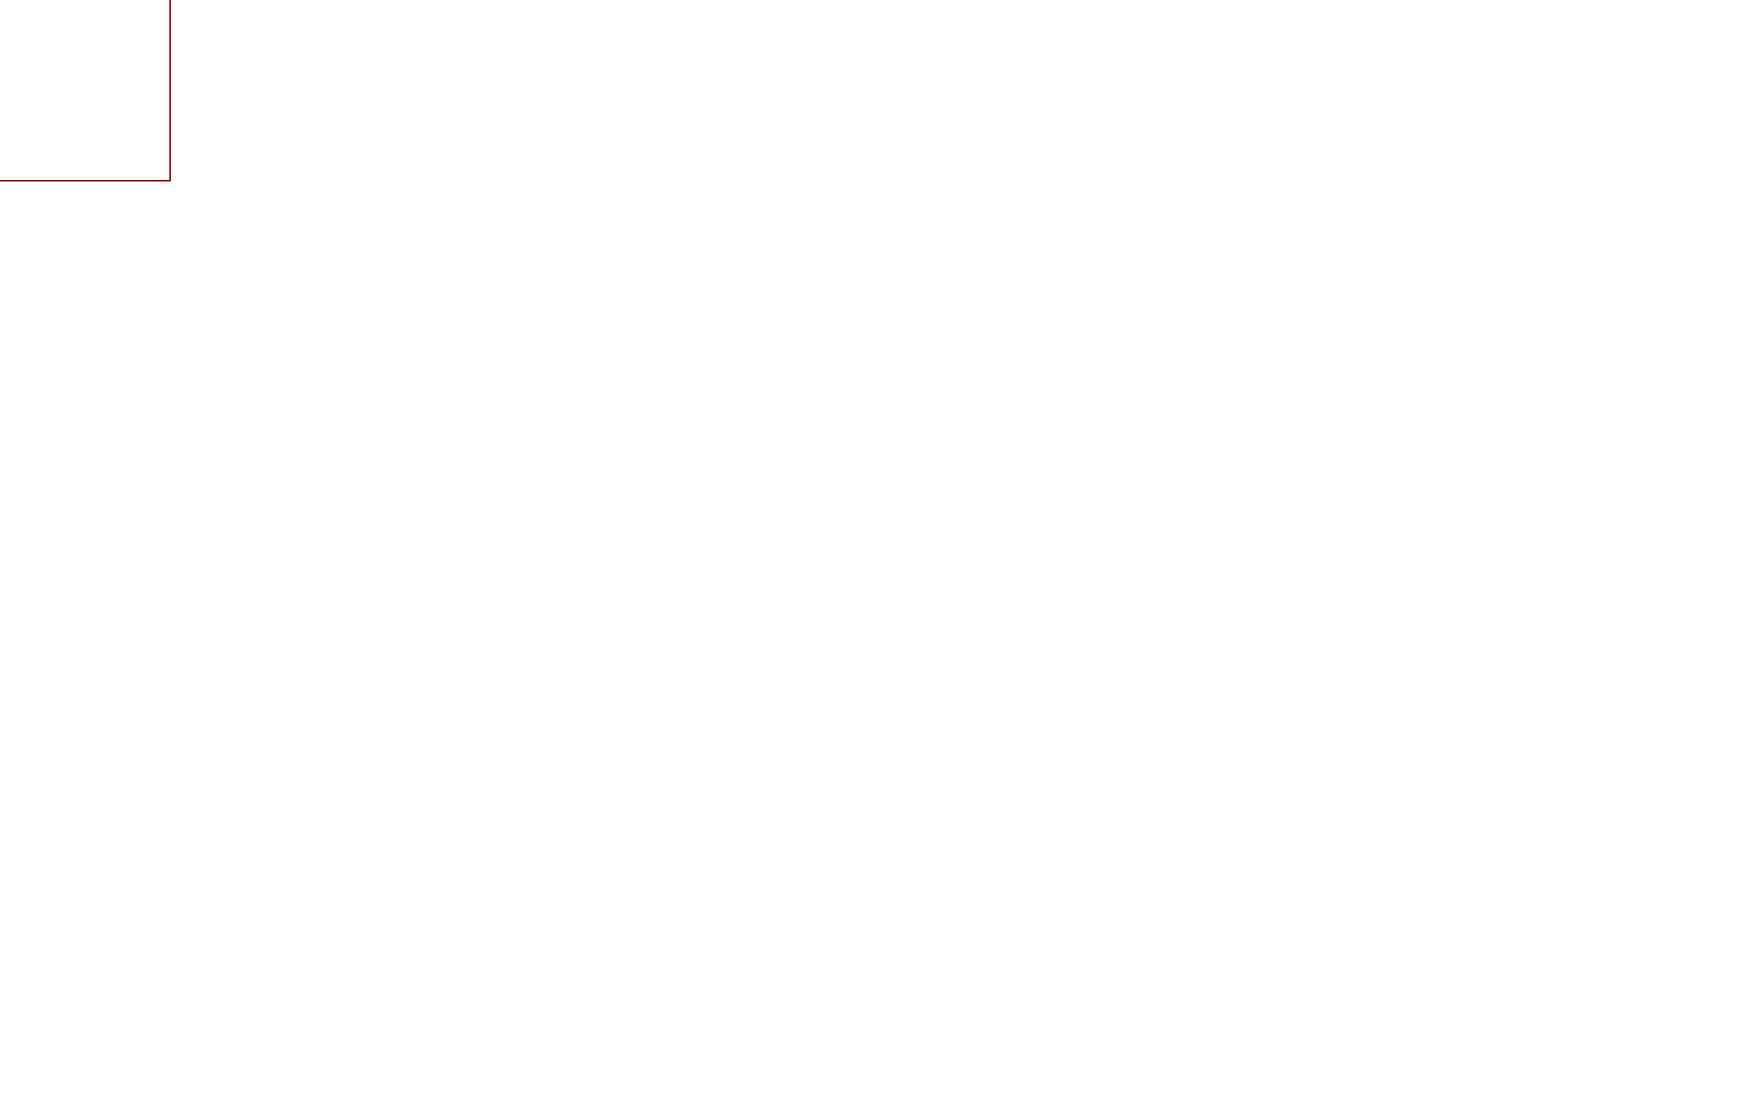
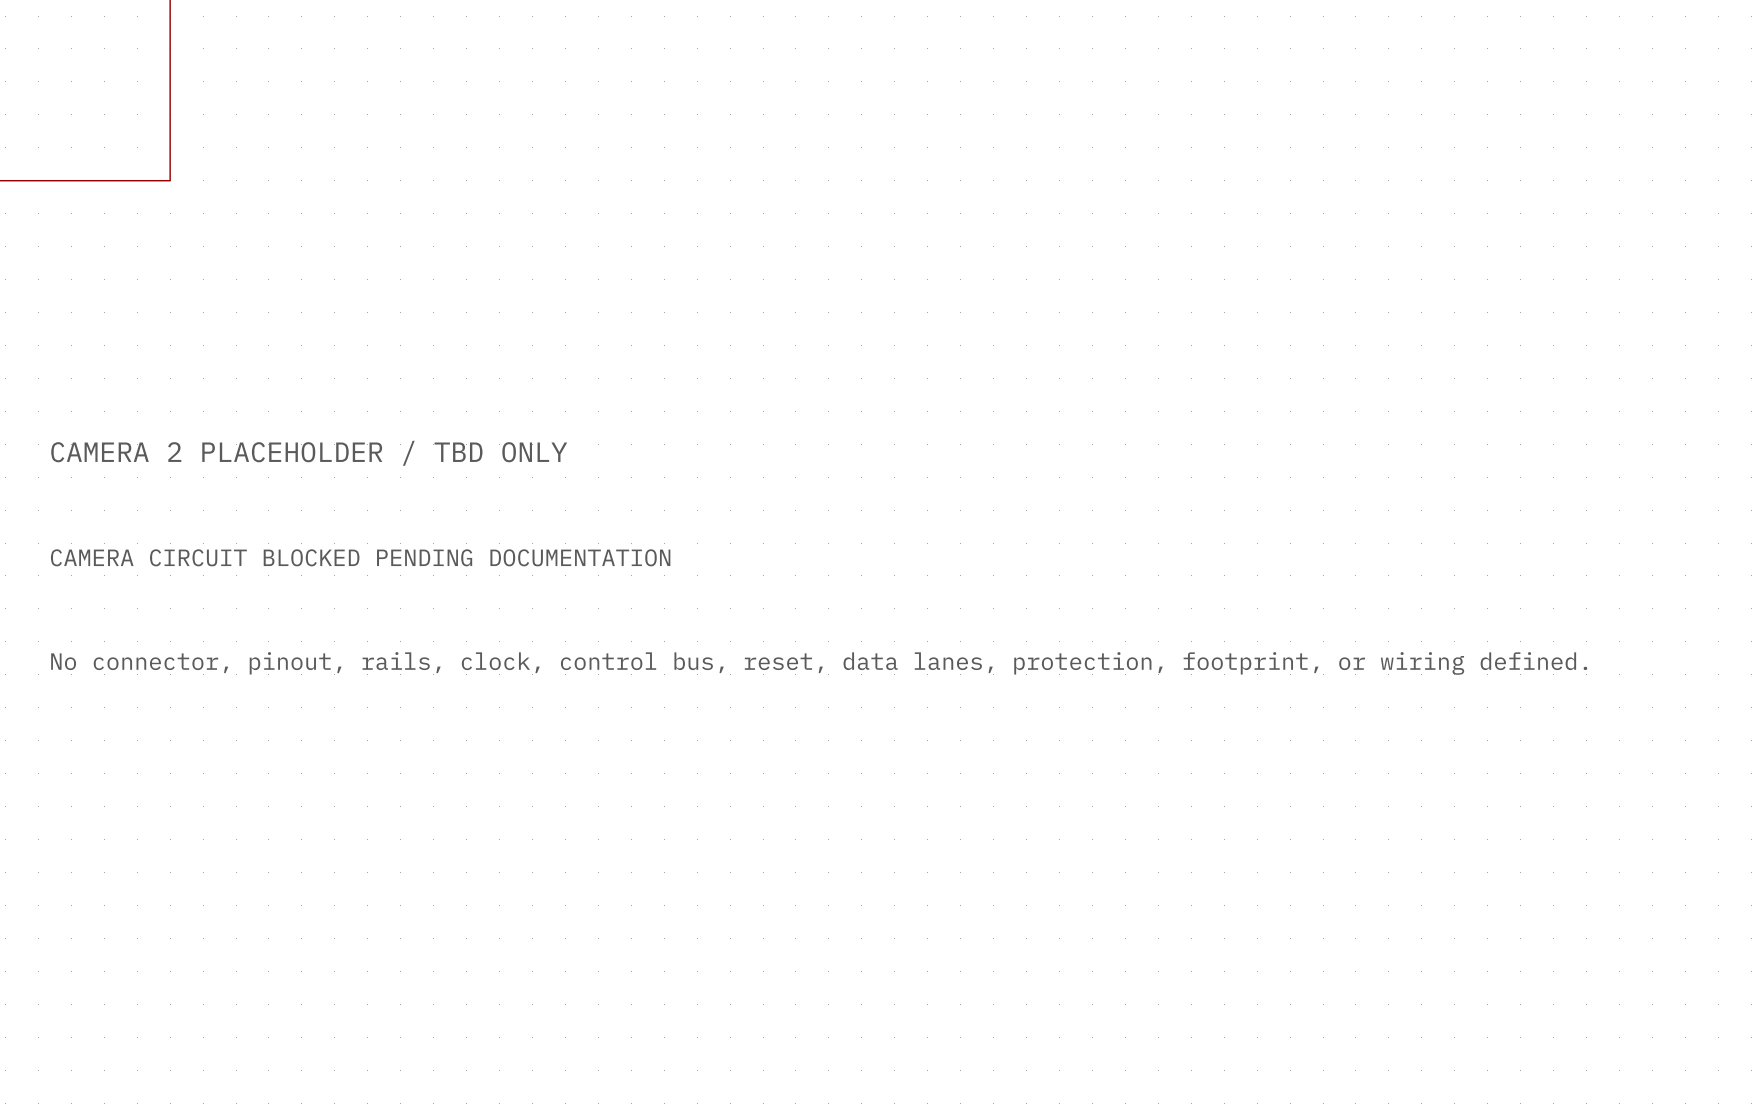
text: none -> CAMERA 2 PLACEHOLDER / TBD ONLY (309, 453)
text: none -> CAMERA CIRCUIT BLOCKED PENDING DOCUMENTATION (360, 557)
text: none -> No connector, pinout, rails, clock, control bus, reset, data lanes, protection, footprint, or wiring defined. (819, 663)

